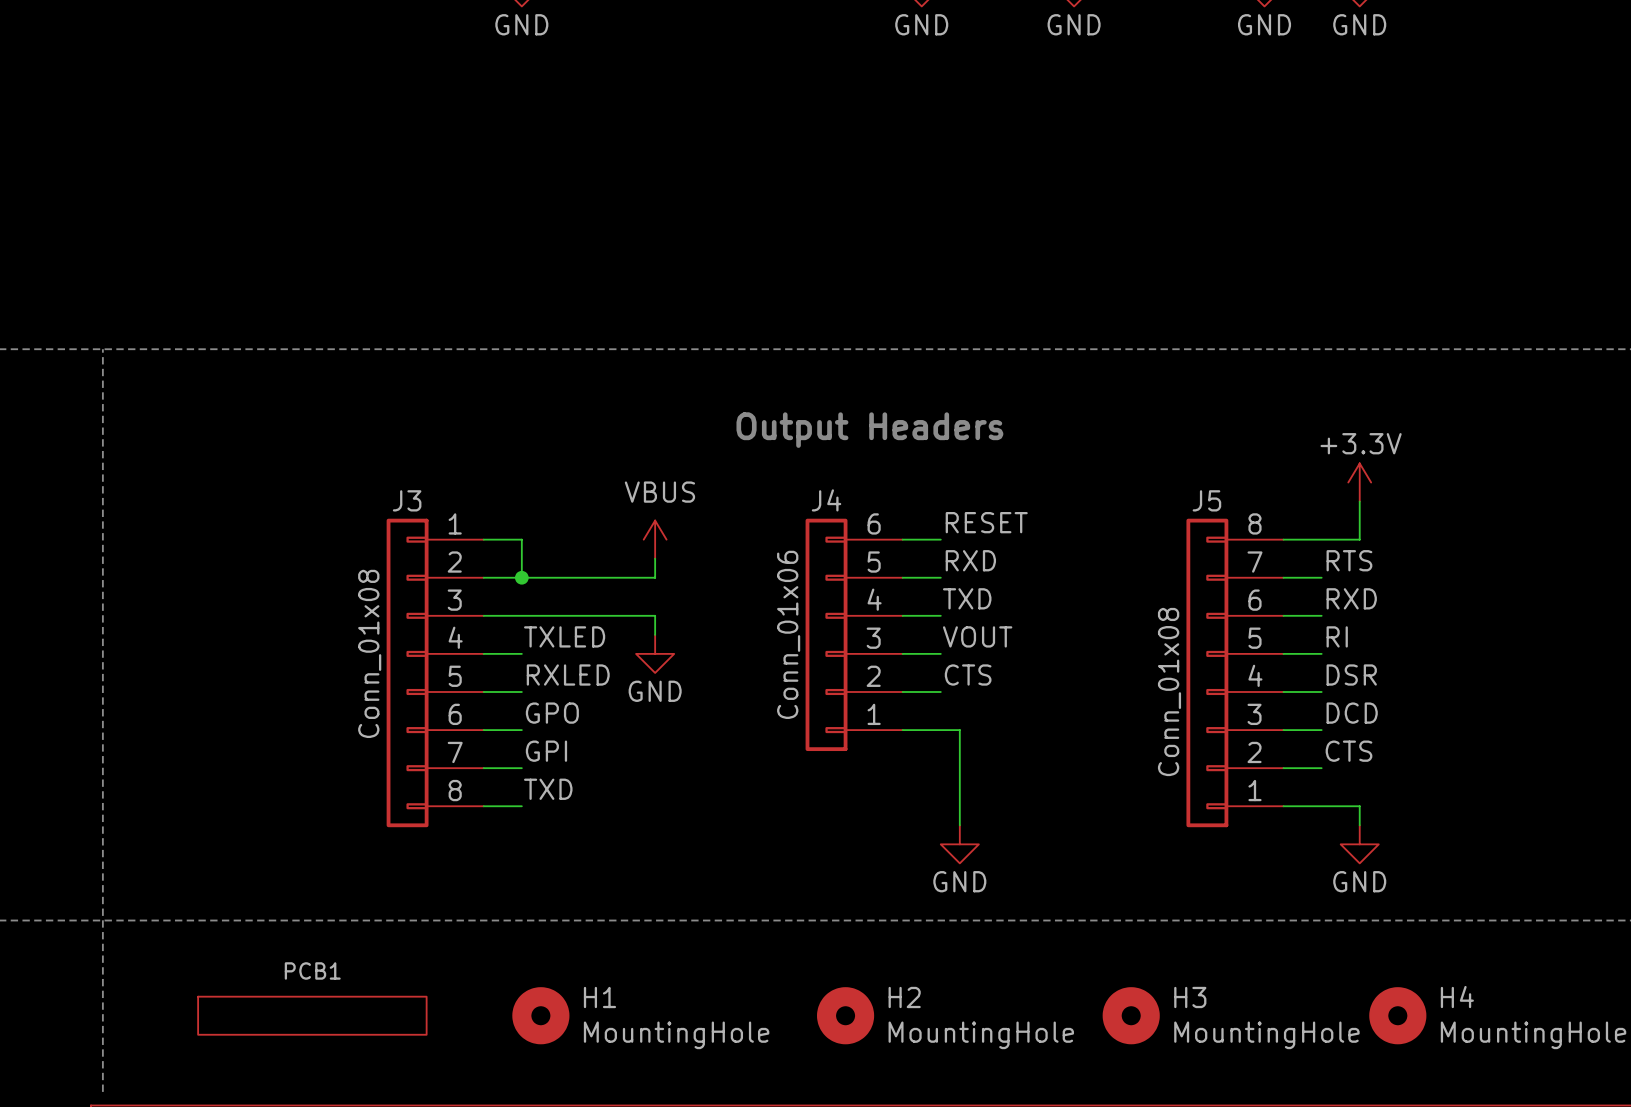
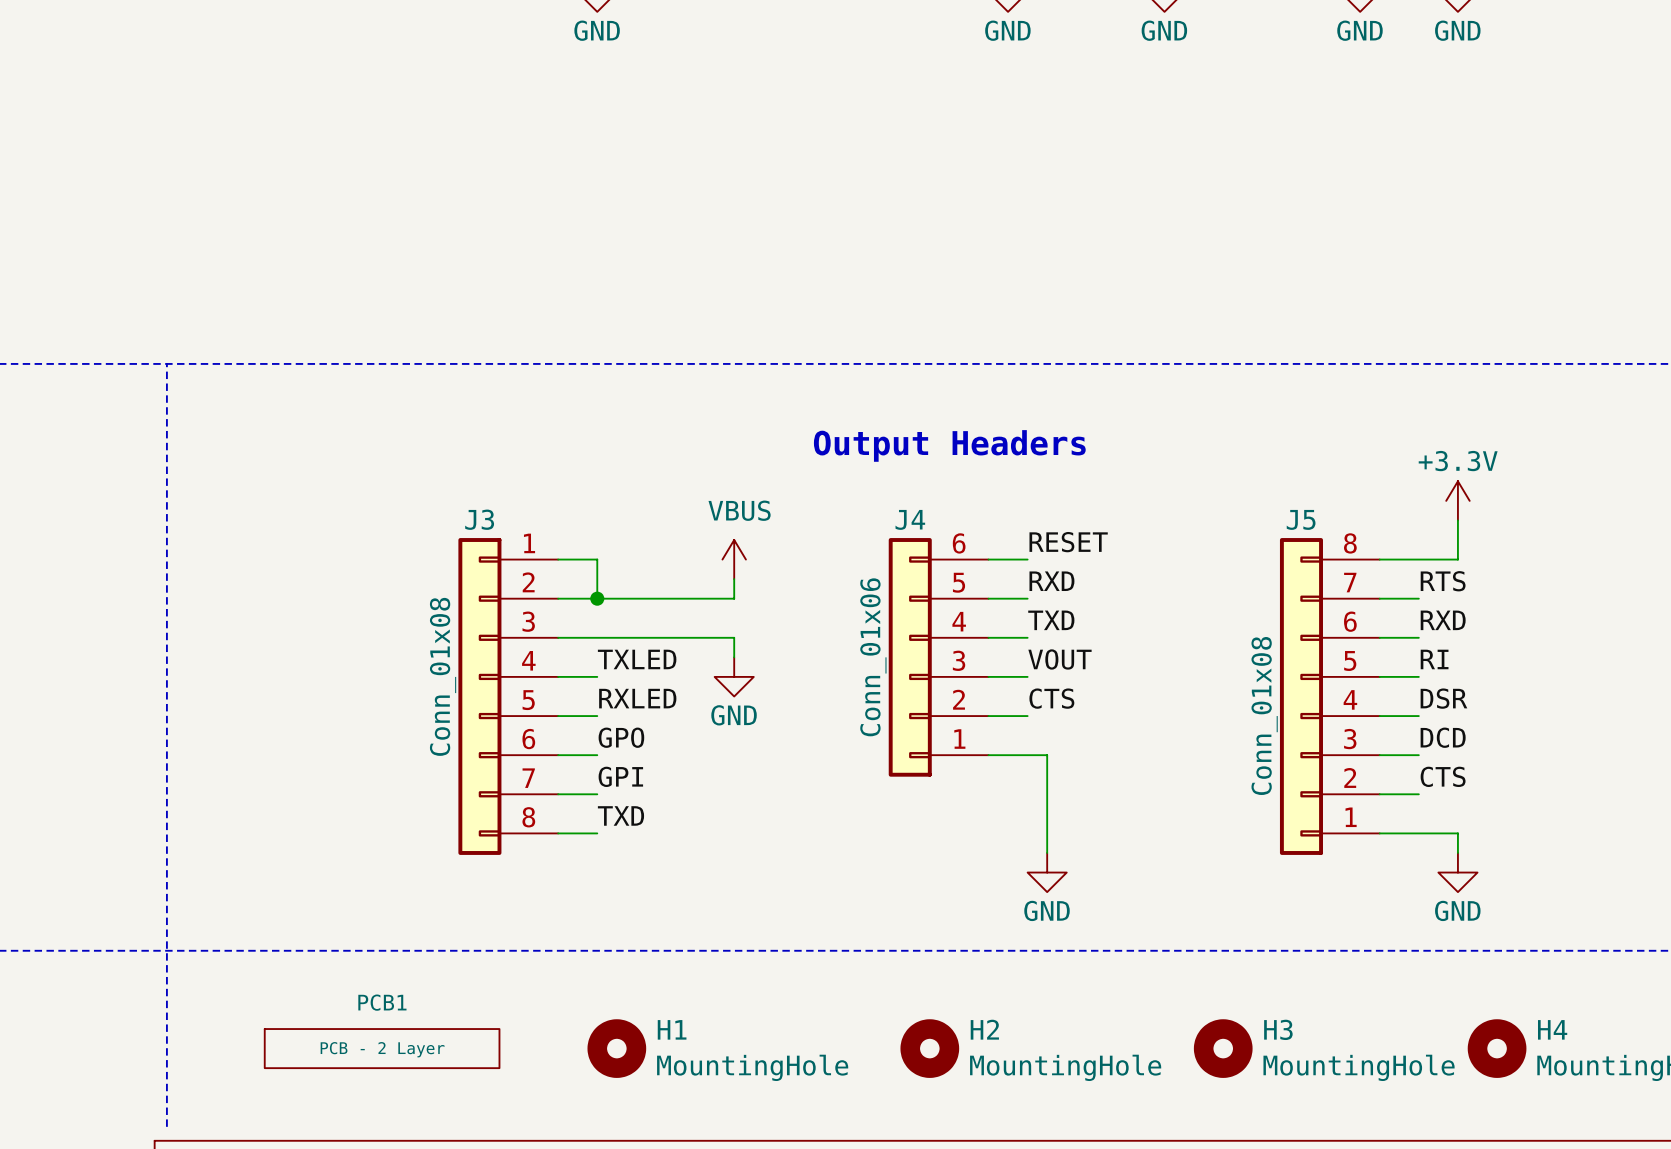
PCB1 value: none -> PCB - 2 Layer (382, 1049)

